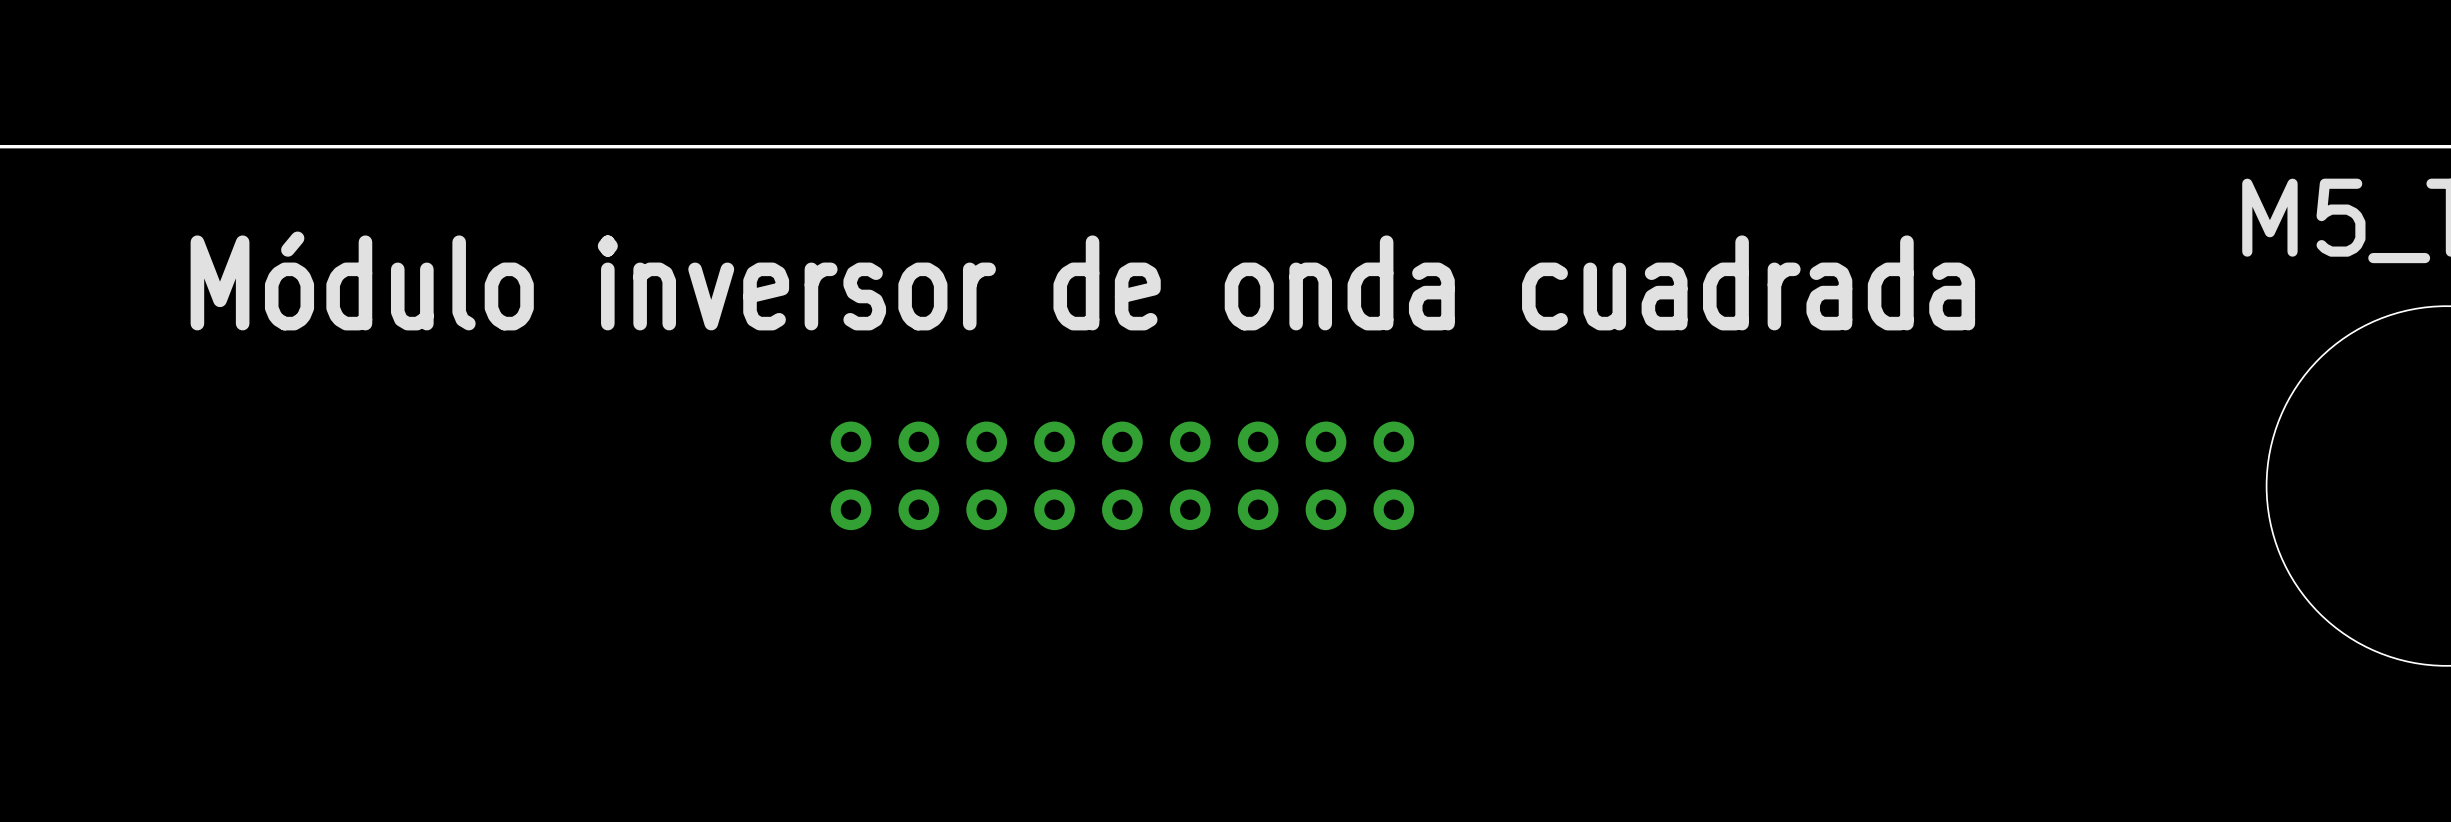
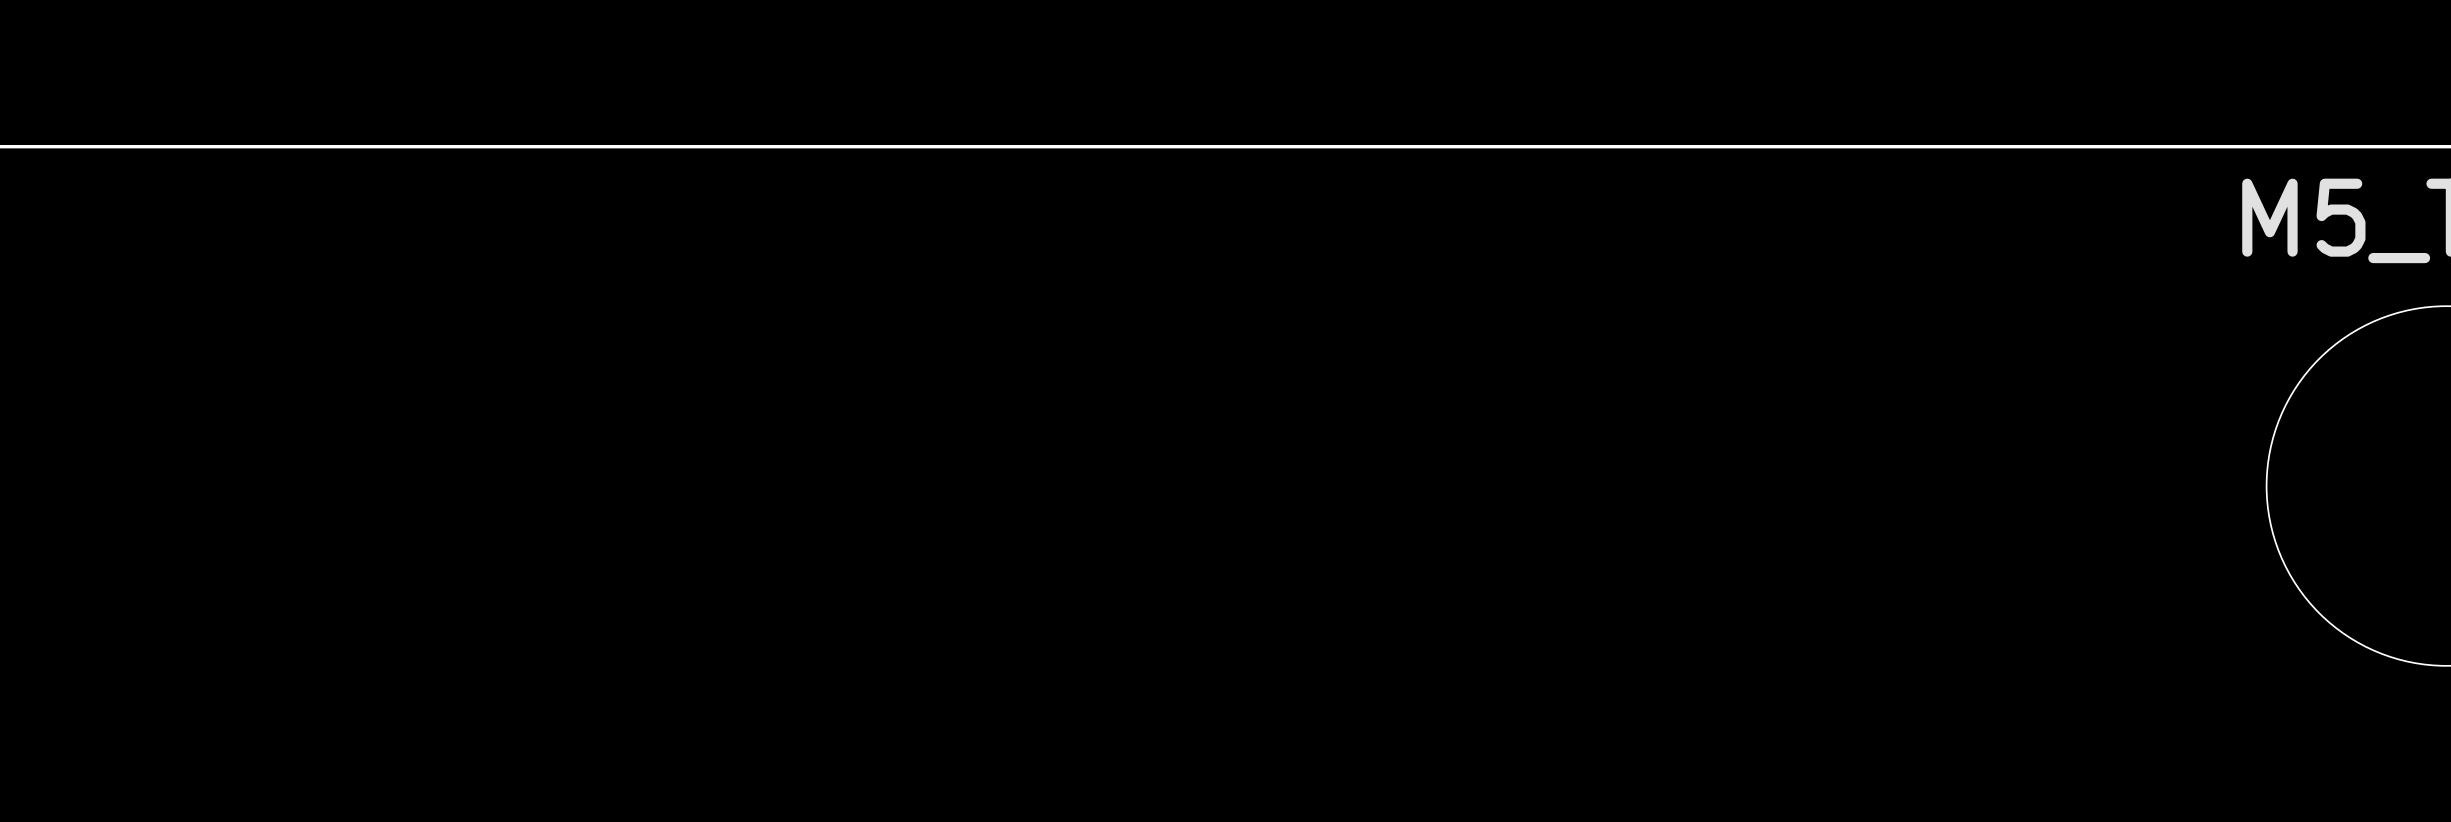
text: Módulo inversor de onda cuadrada (1082, 280) -> none
via: (850, 441) -> none
via: (918, 441) -> none
via: (986, 441) -> none
via: (1054, 441) -> none
via: (1122, 441) -> none
via: (1190, 441) -> none
via: (1258, 441) -> none
via: (1326, 441) -> none
via: (1393, 441) -> none
via: (850, 509) -> none
via: (918, 509) -> none
via: (986, 509) -> none
via: (1054, 509) -> none
via: (1122, 509) -> none
via: (1190, 509) -> none
via: (1258, 509) -> none
via: (1326, 509) -> none
via: (1393, 509) -> none

